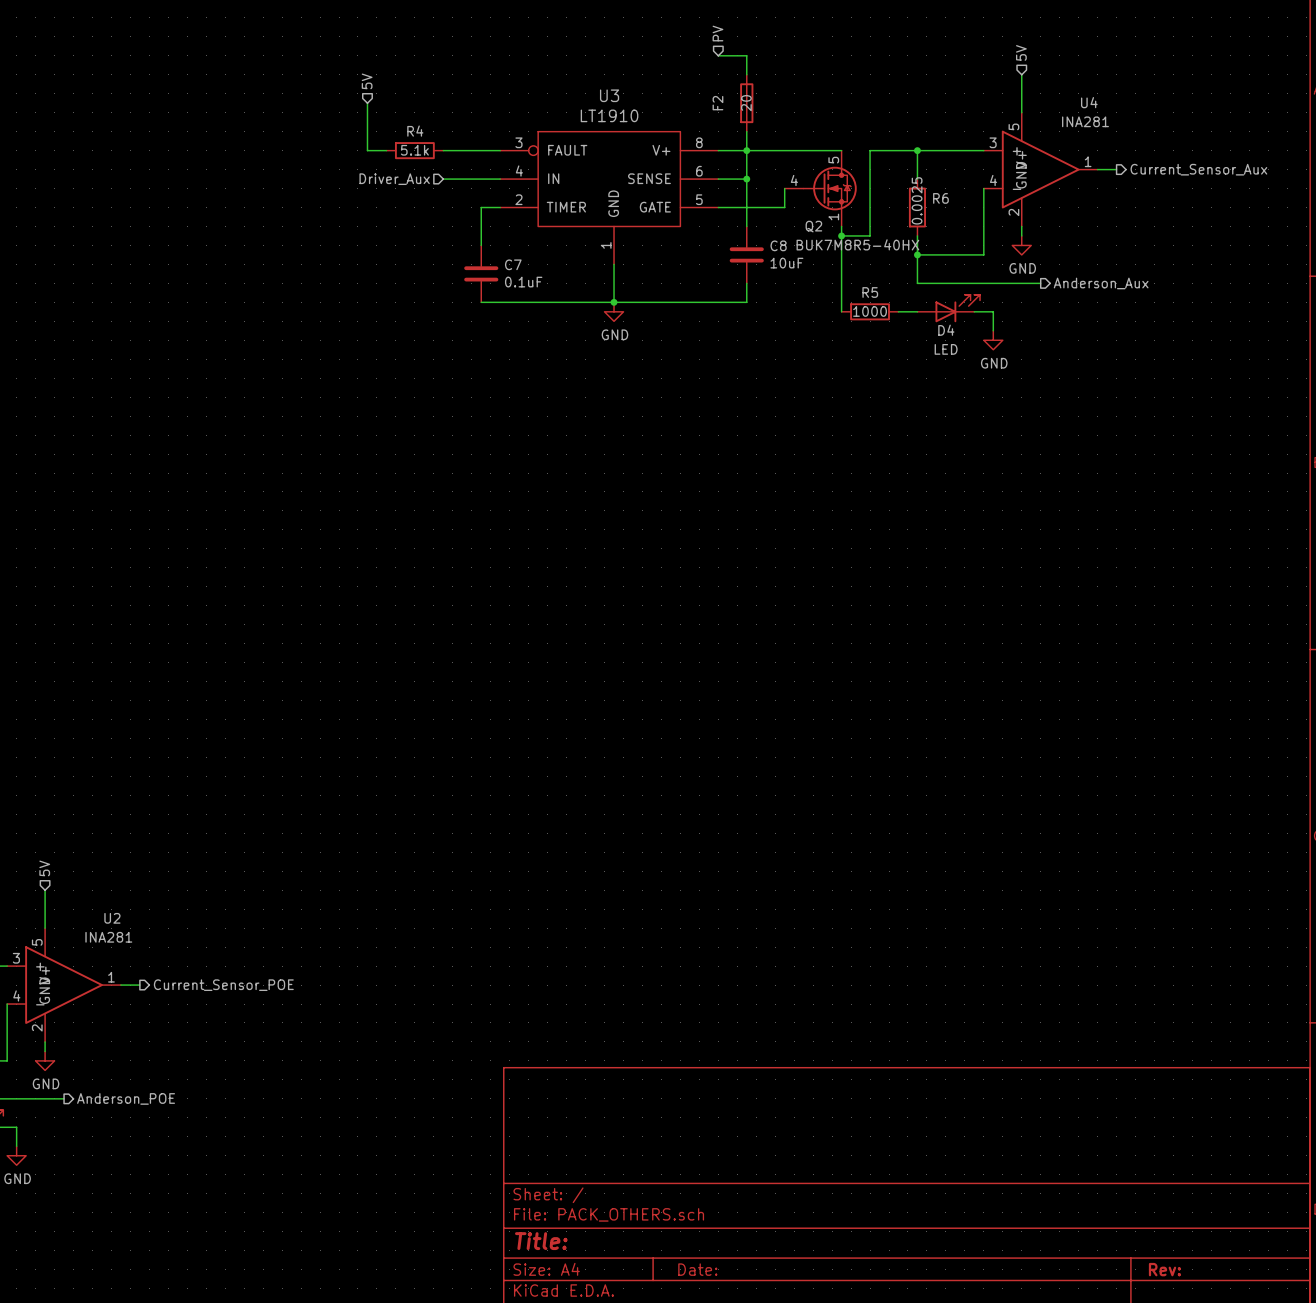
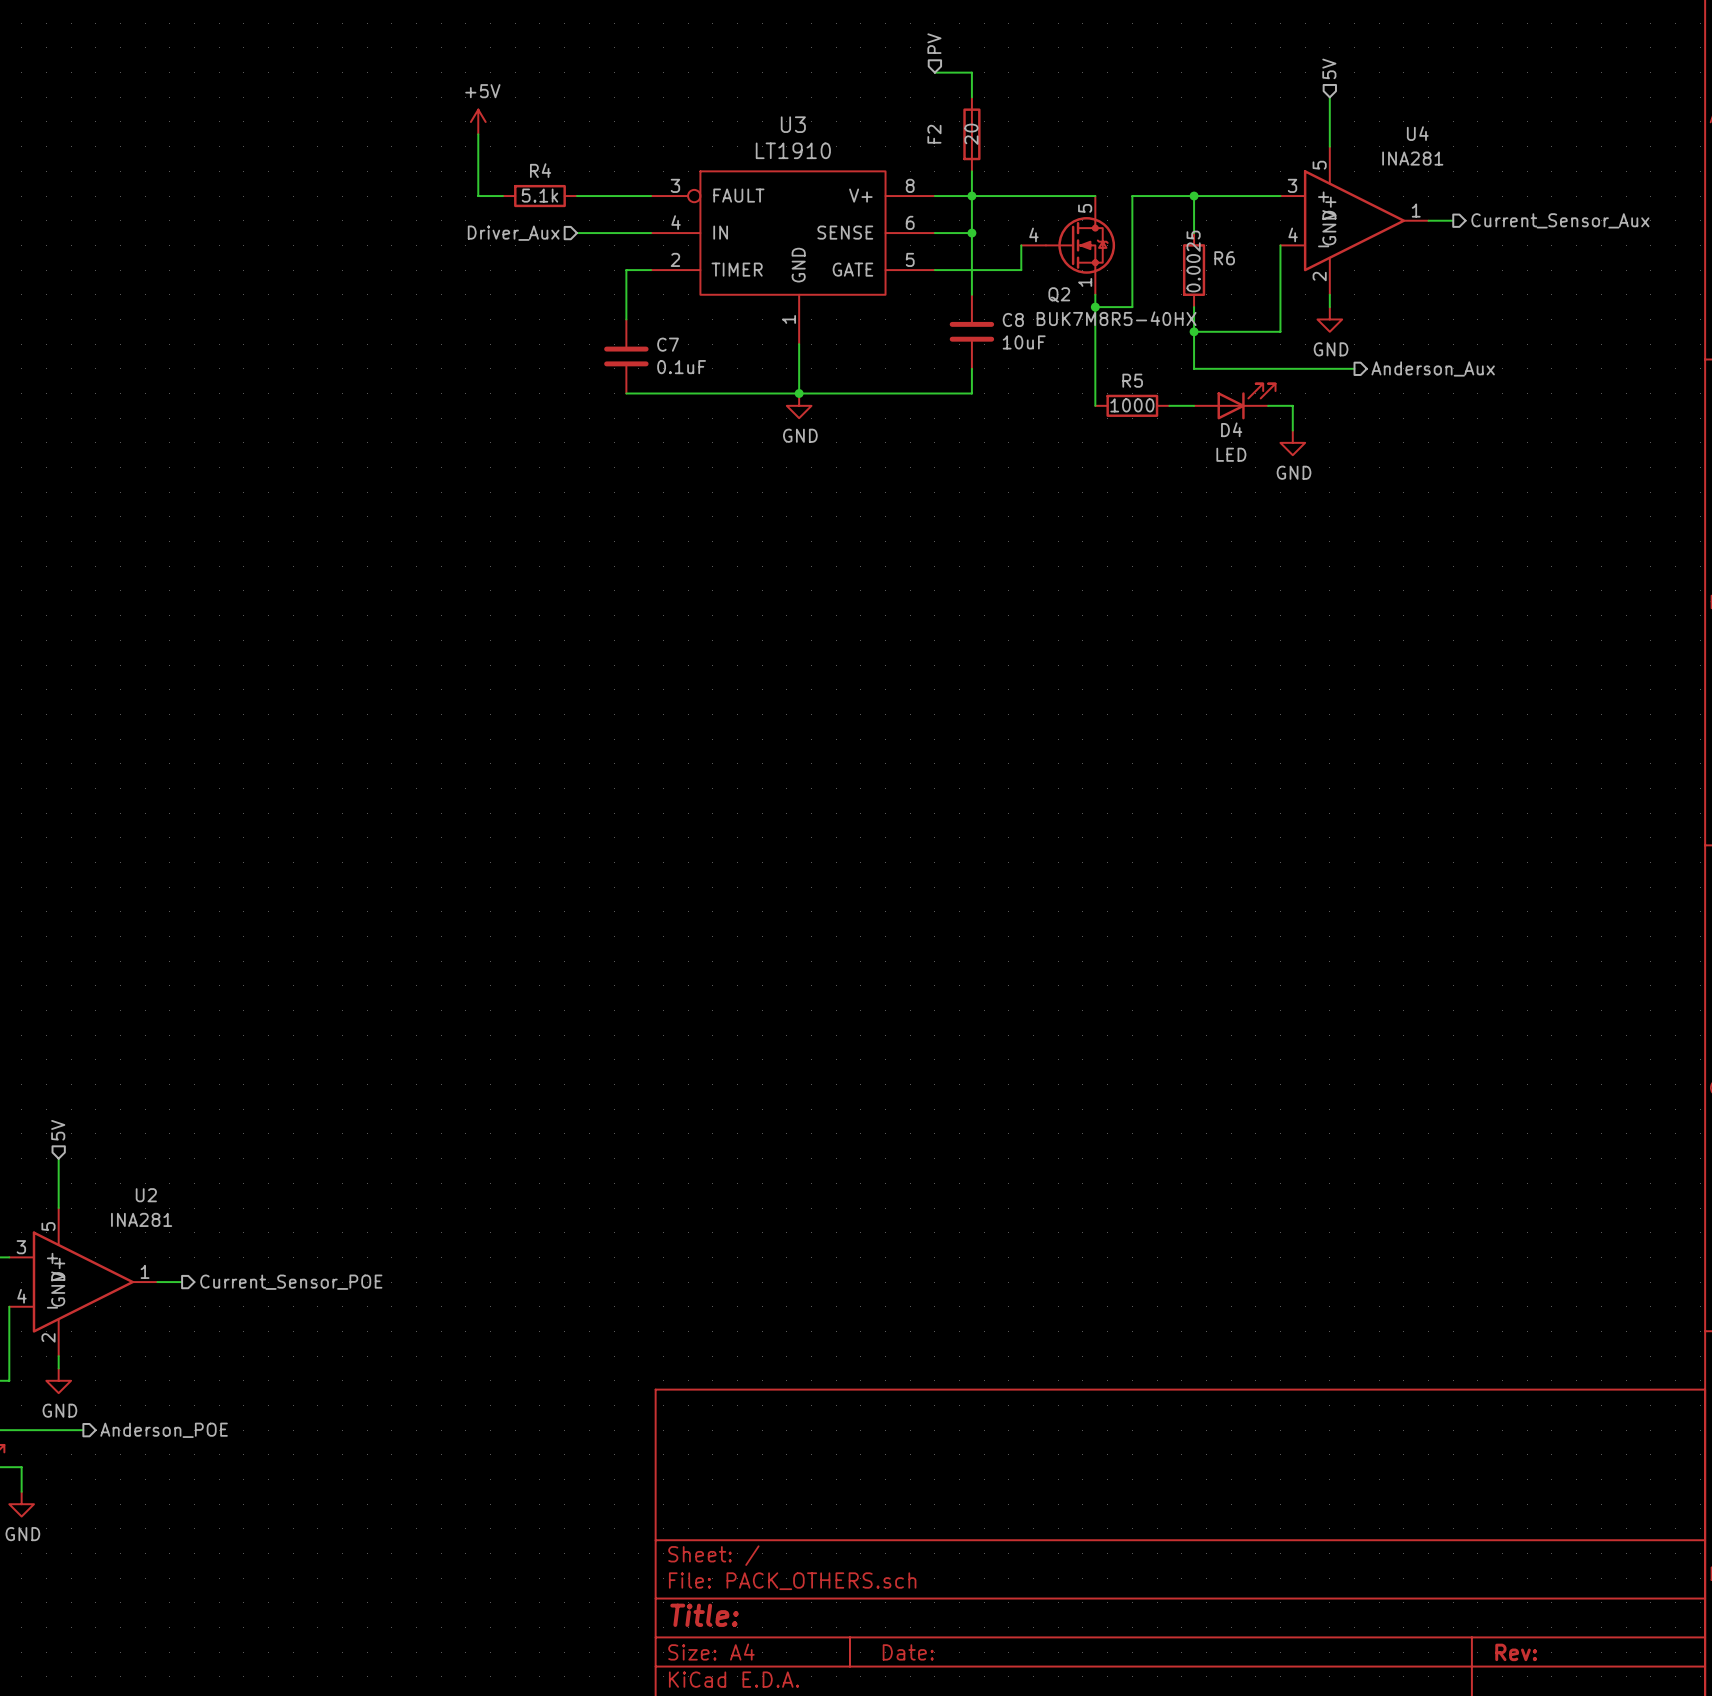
hierarchical label: 5V (367, 81) -> none
power symbol: none -> +5V (478, 121)

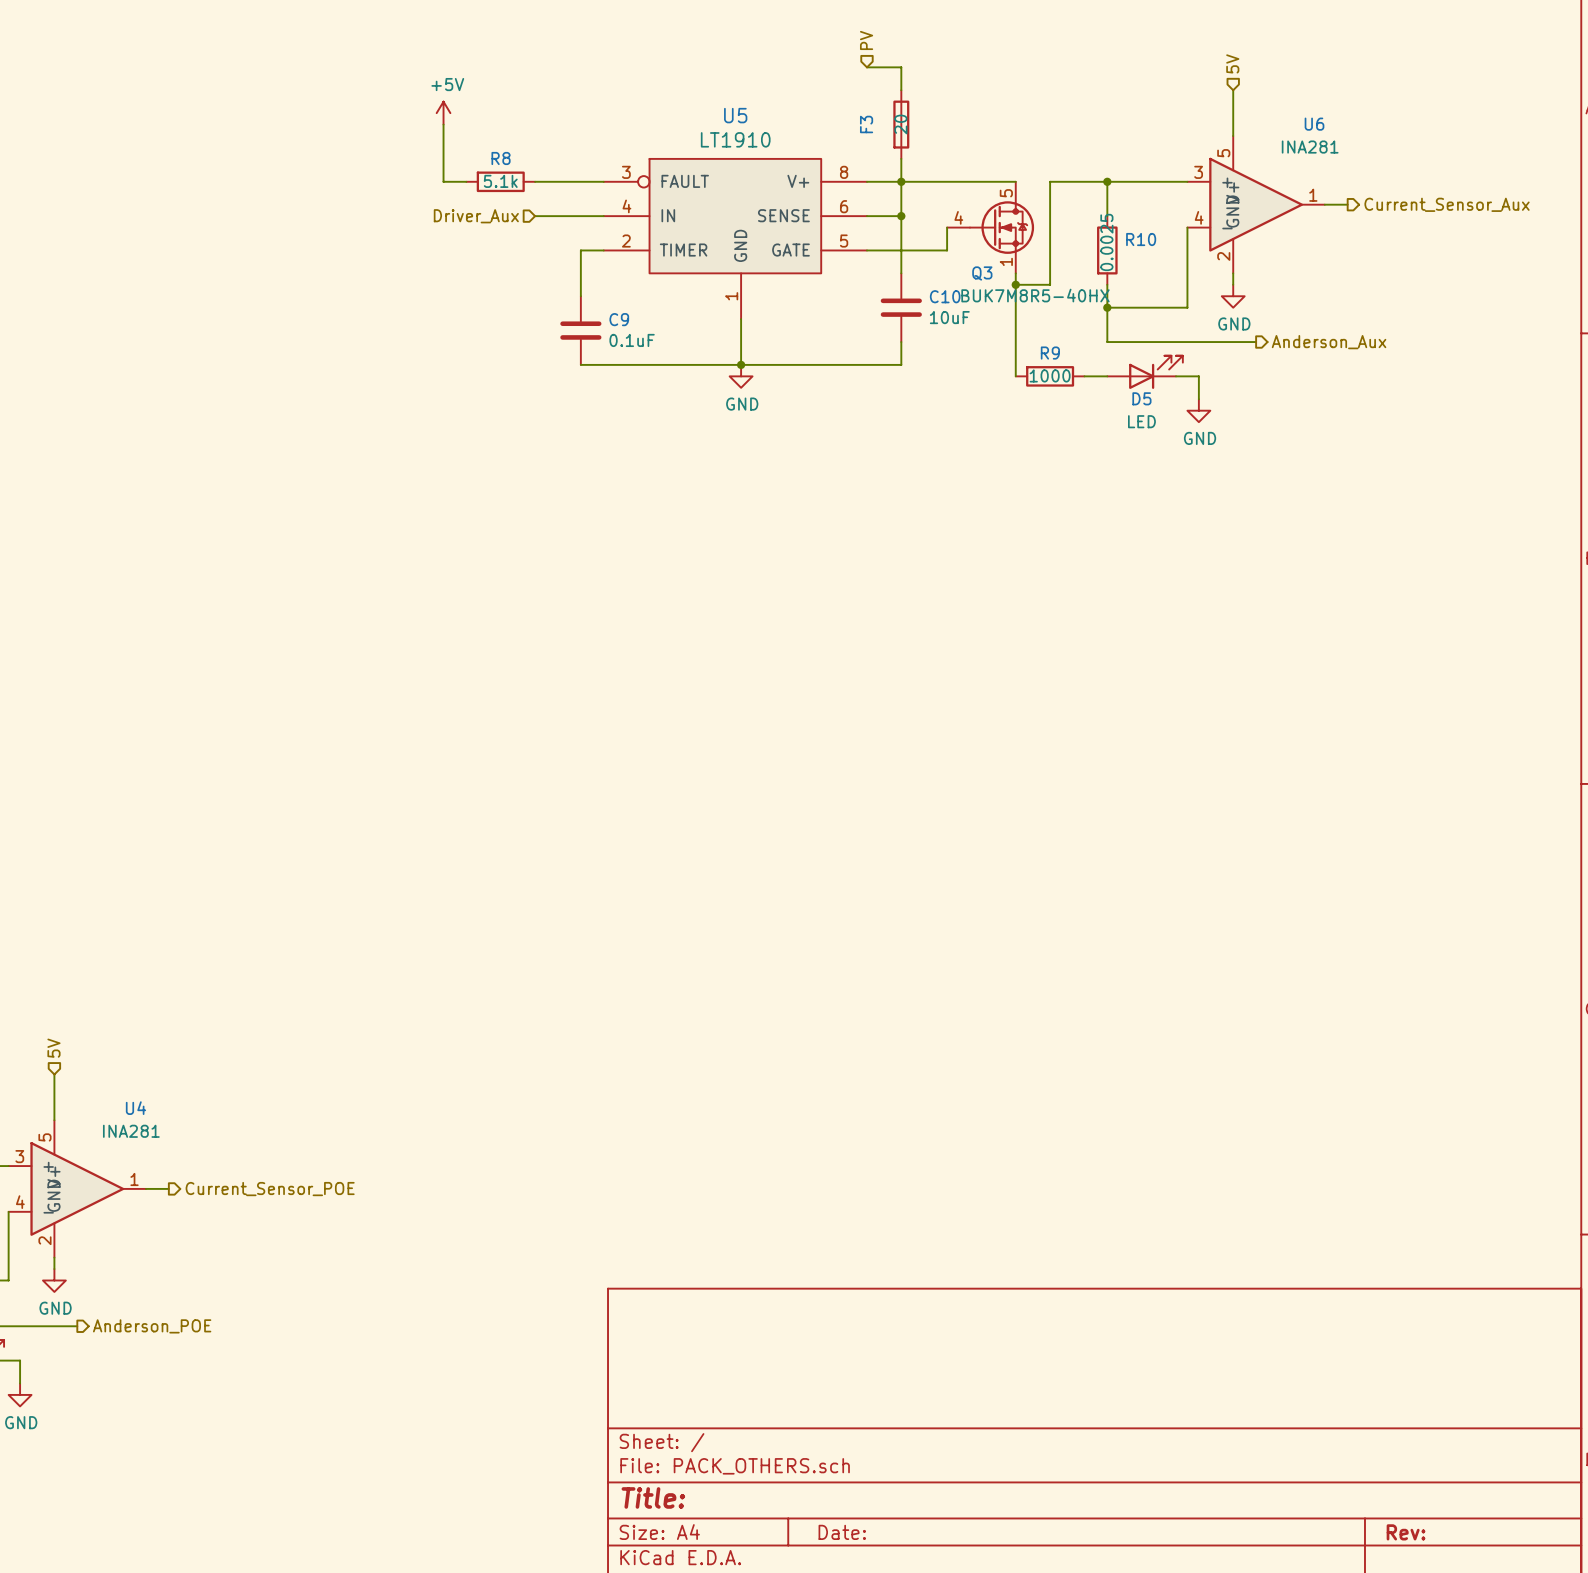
U3 name: U3 (793, 124) -> U5 (735, 115)
U4 name: U4 (1417, 133) -> U6 (1314, 124)
F2 name: F2 (934, 134) -> F3 (866, 124)
R4 name: R4 (540, 170) -> R8 (501, 158)
R6 name: R6 (1224, 258) -> R10 (1141, 239)
Q2 name: Q2 (1059, 294) -> Q3 (982, 273)
C8 name: C8 (1013, 319) -> C10 (945, 296)
C7 name: C7 (668, 344) -> C9 (619, 319)
R5 name: R5 (1132, 380) -> R9 (1050, 353)
D4 name: D4 (1231, 429) -> D5 (1141, 398)
U2 name: U2 (146, 1195) -> U4 (135, 1108)

